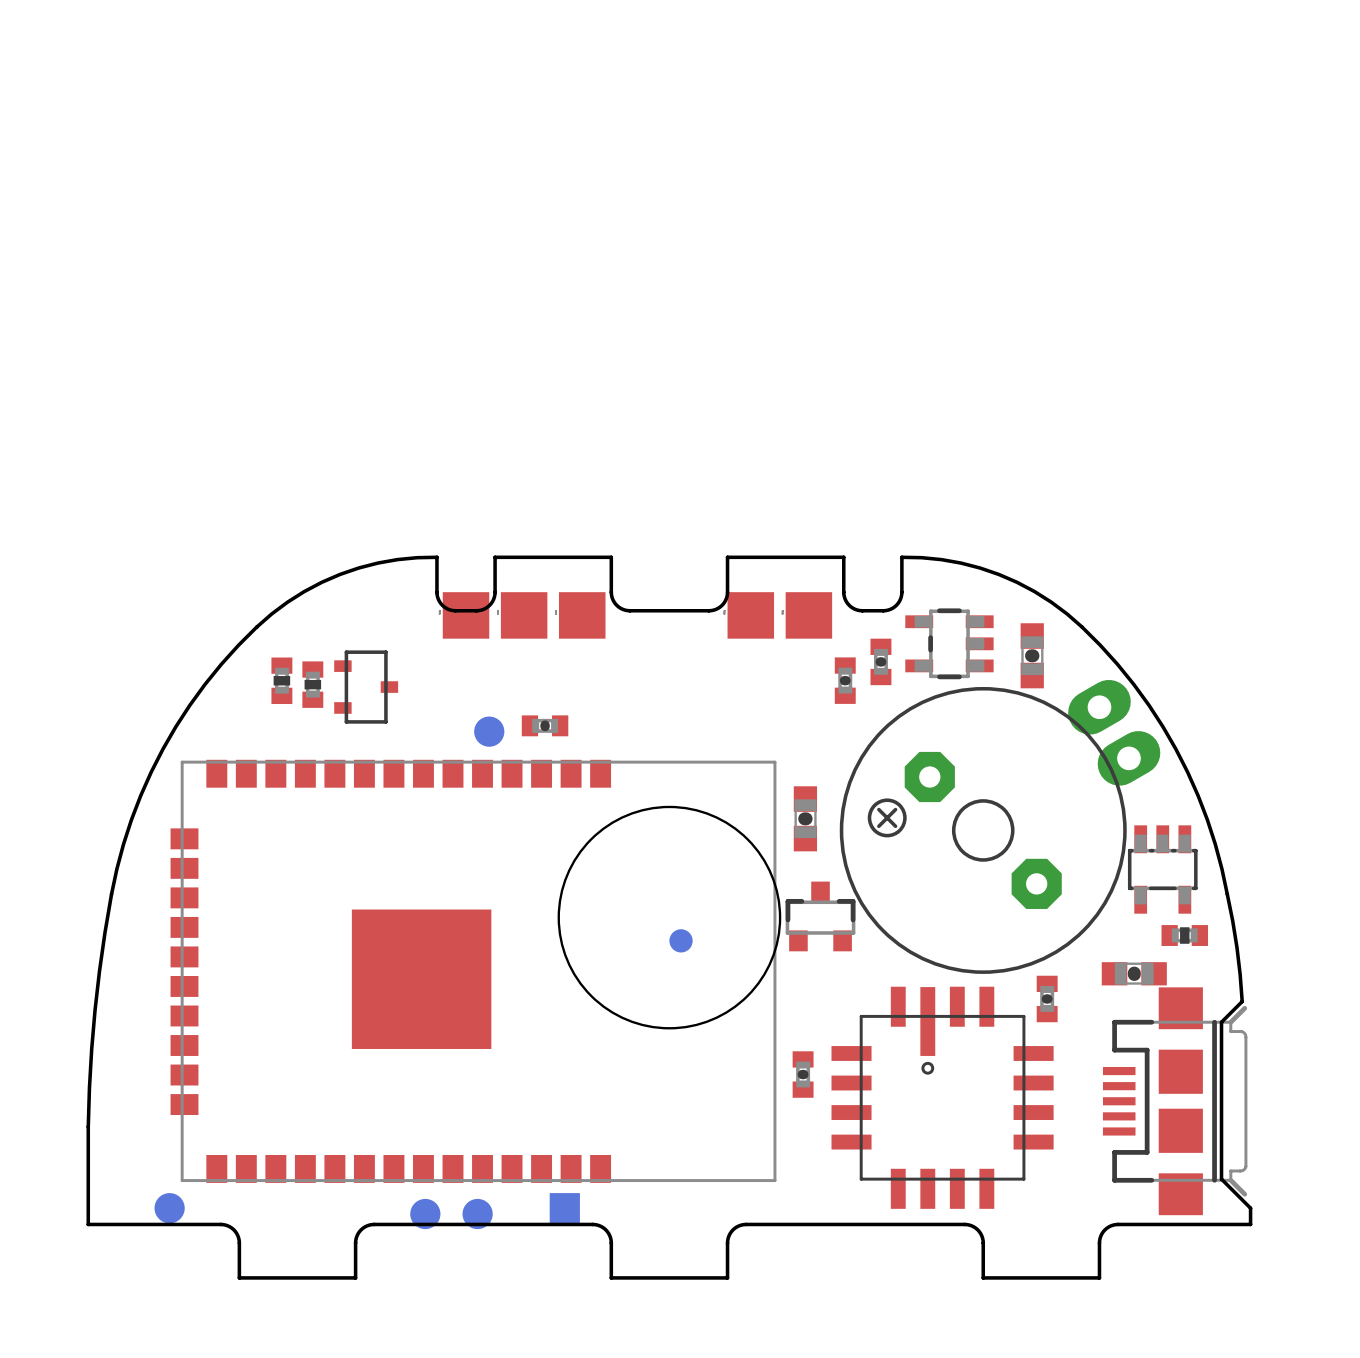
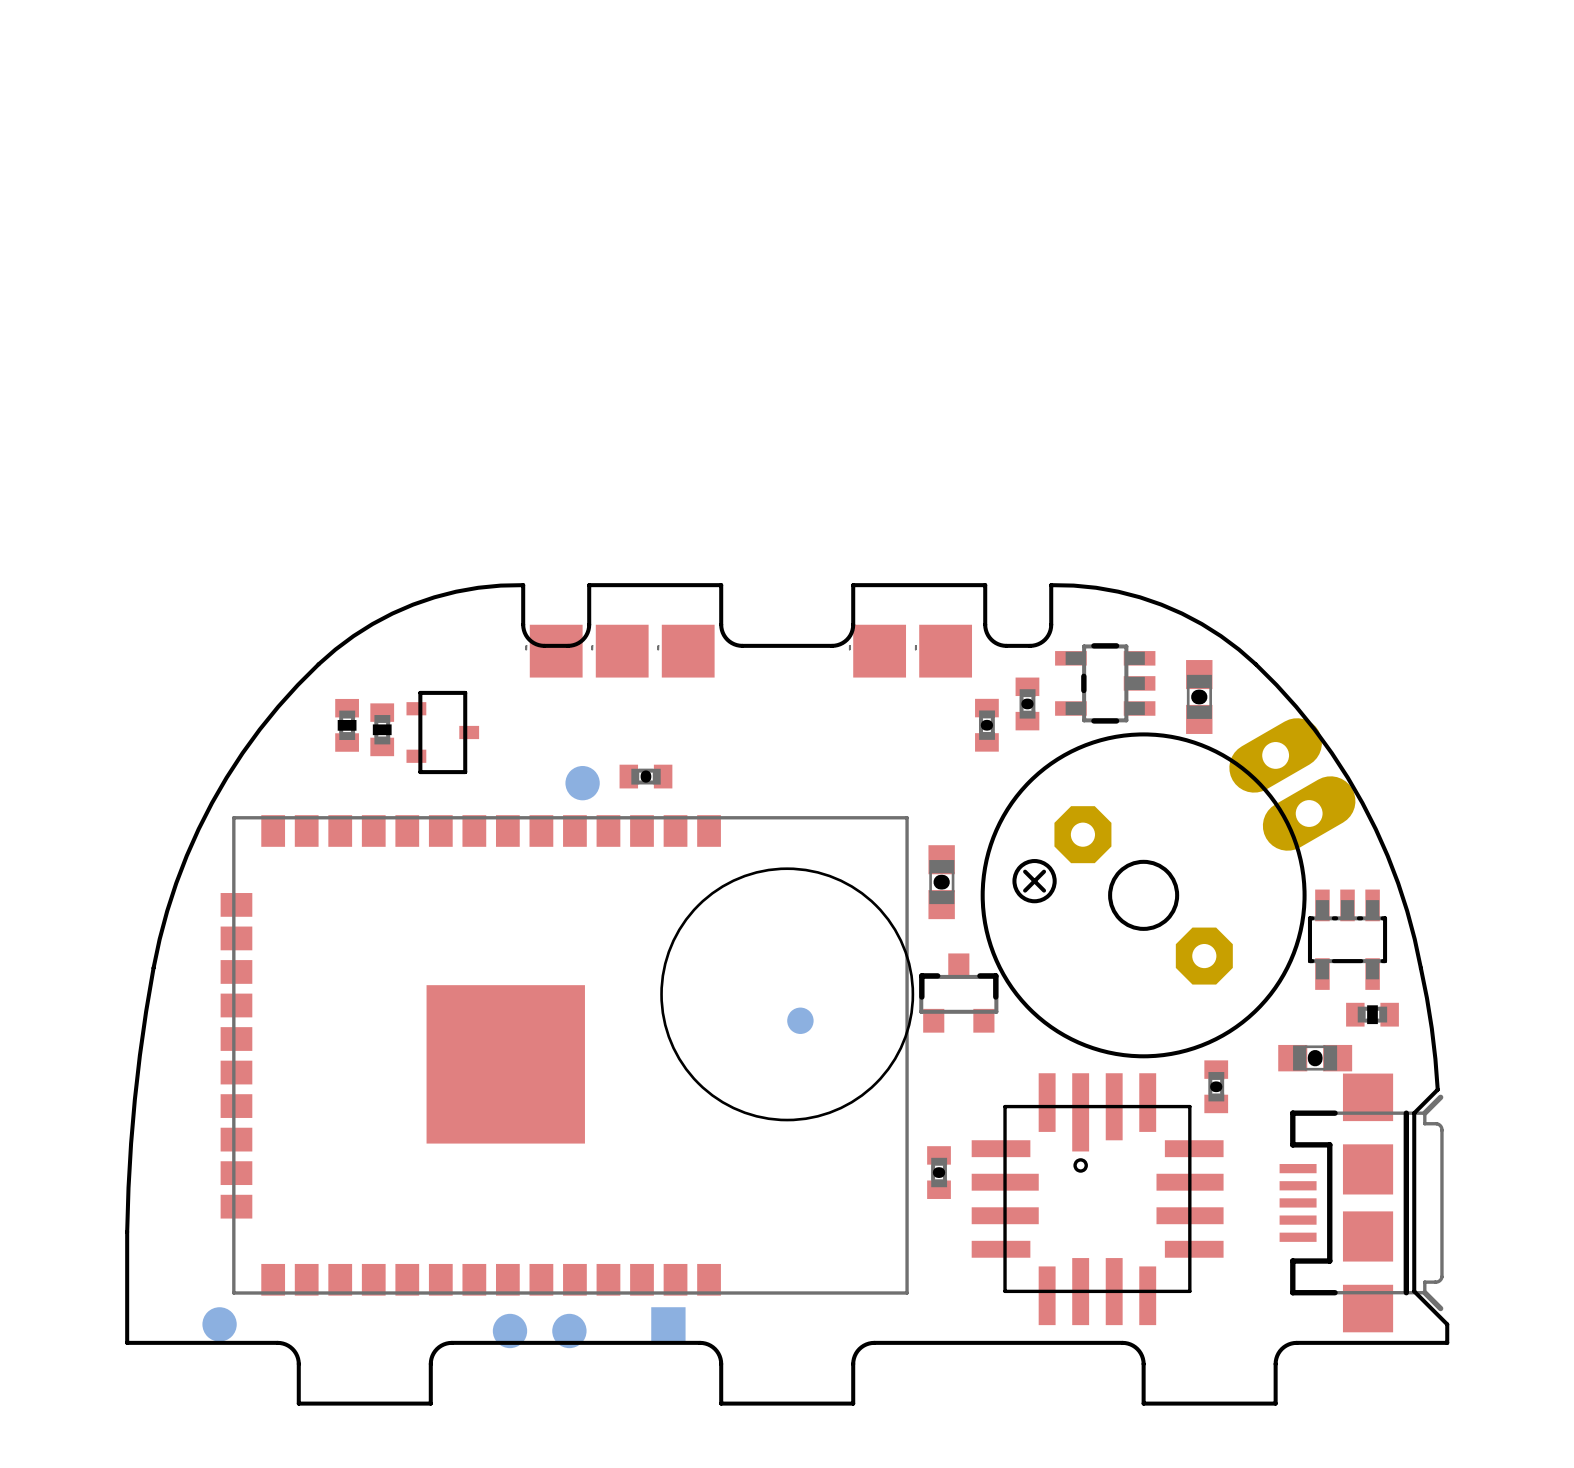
part footprint: [1068, 679, 1161, 786] -> [1229, 718, 1356, 851]
part footprint: [831, 986, 1054, 1209] -> [971, 1073, 1224, 1326]

